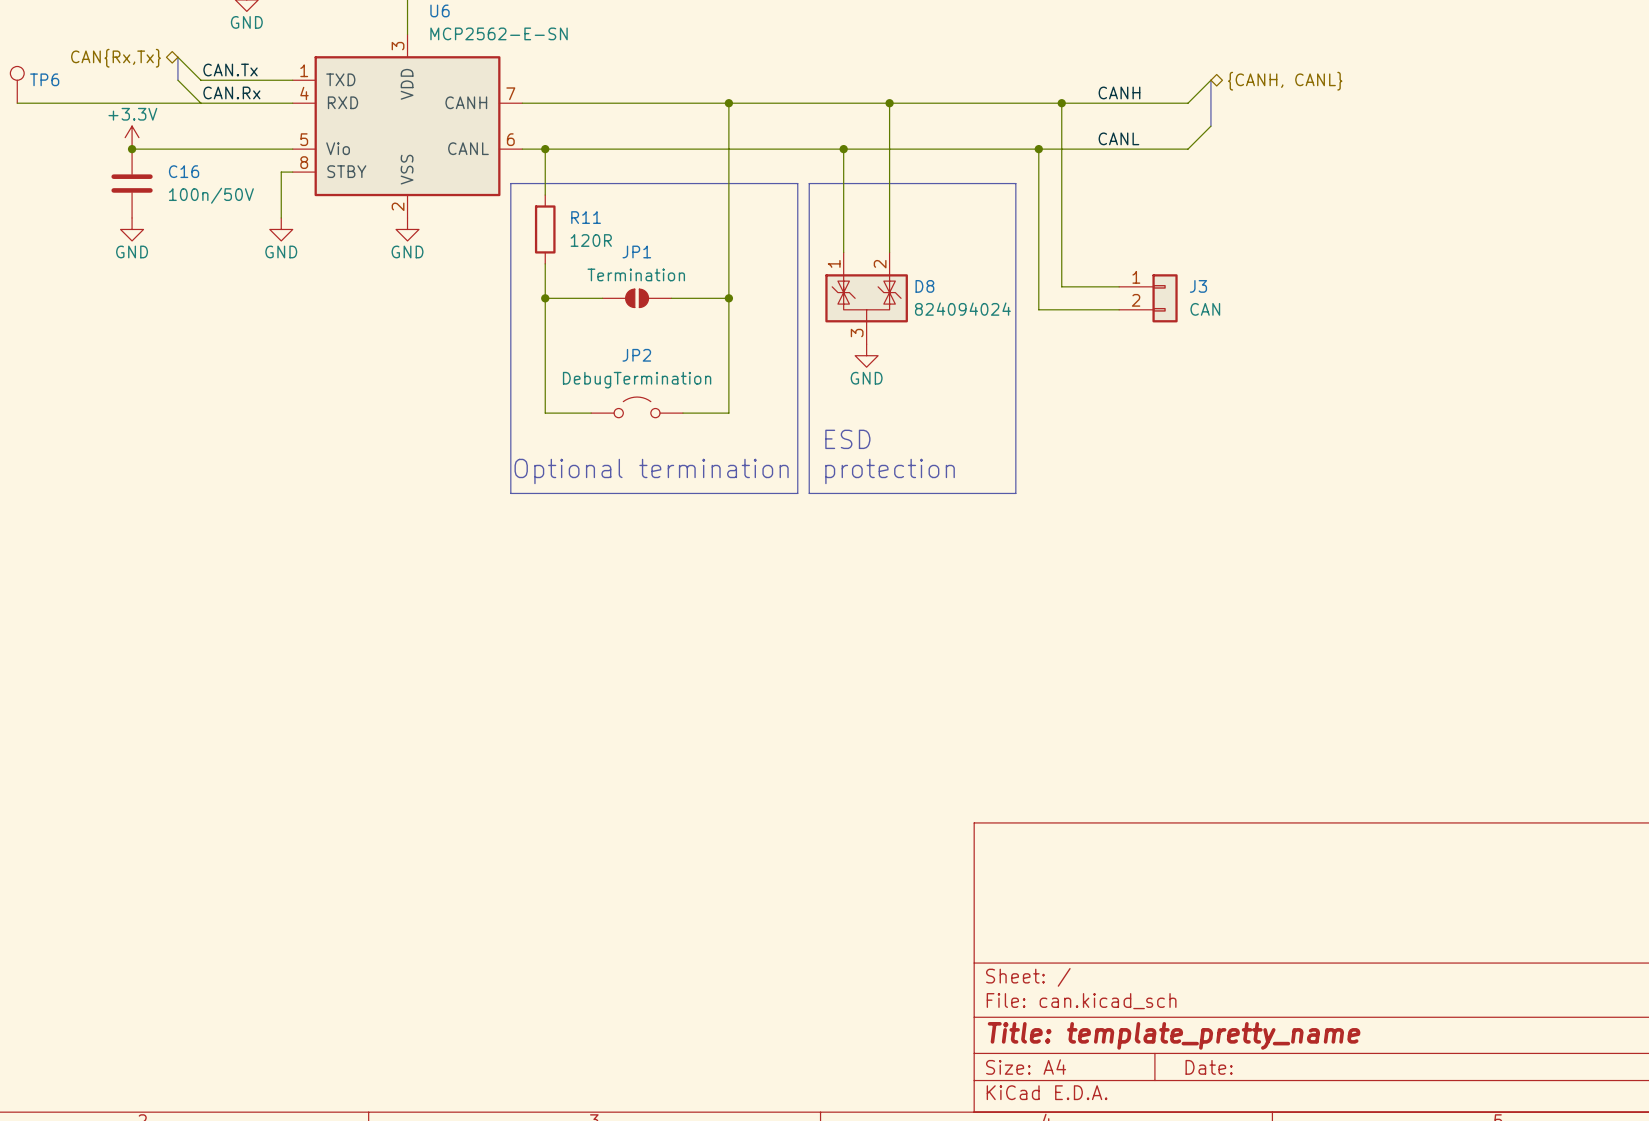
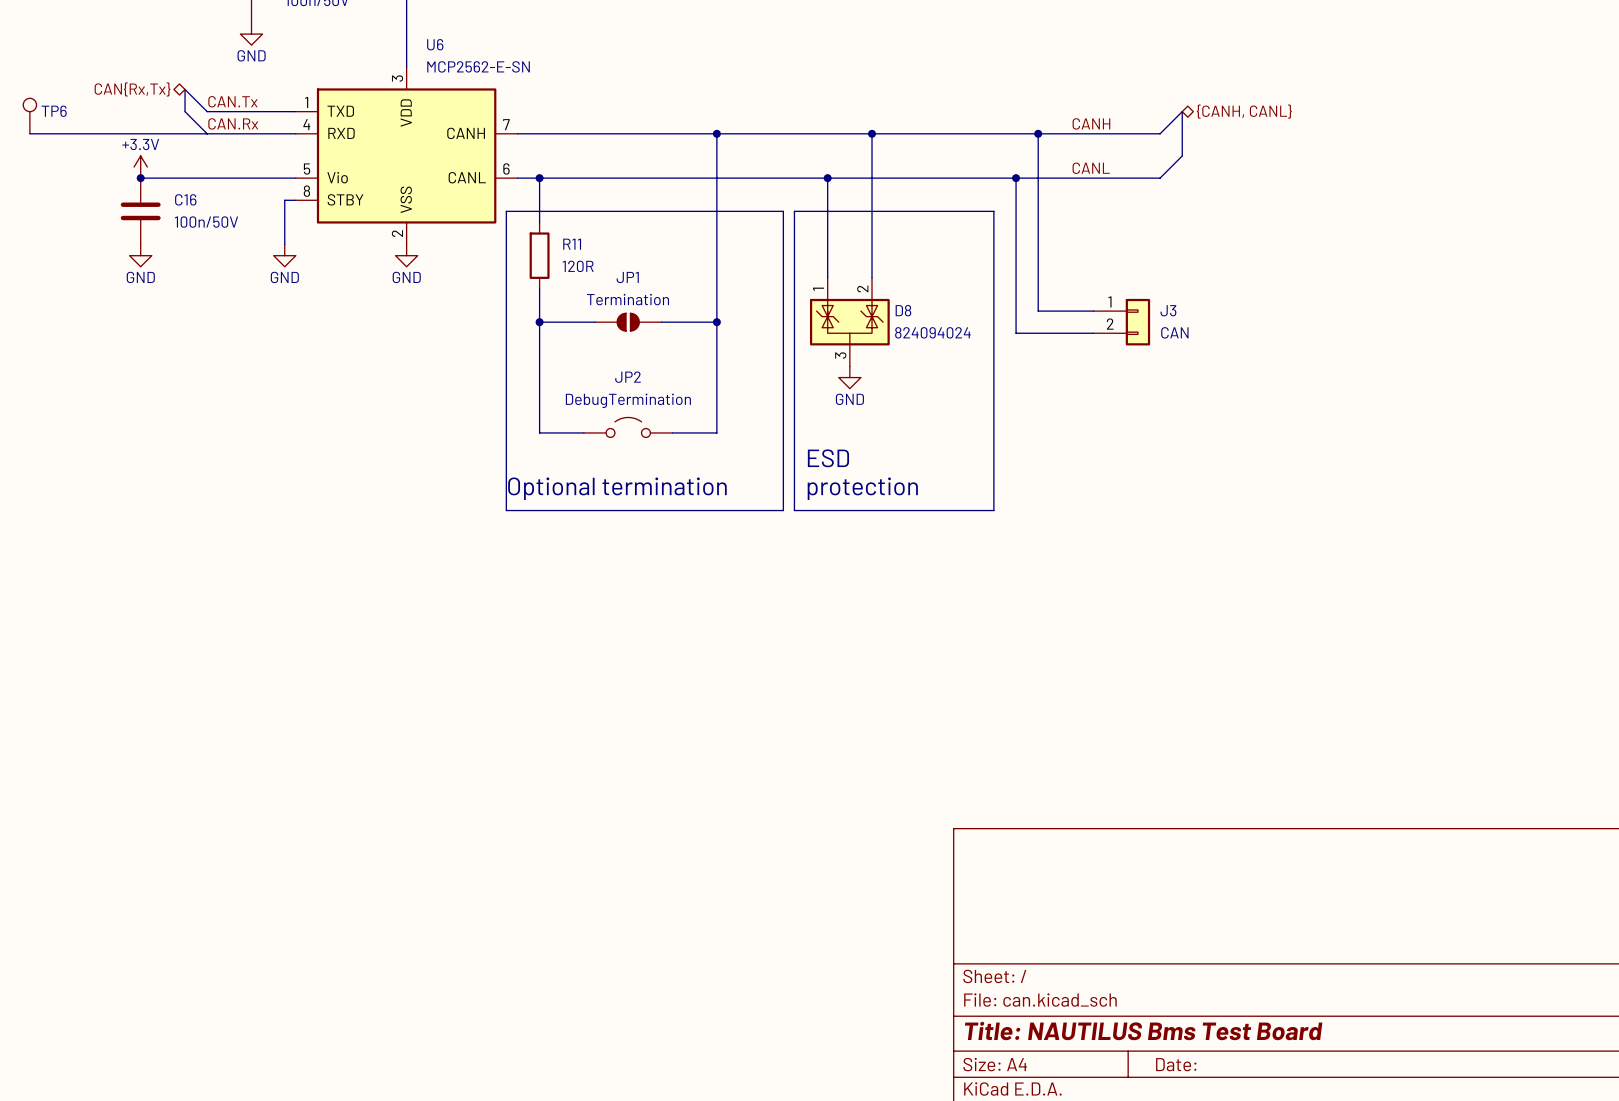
title block: Title: template_pretty_name (1174, 1035) -> Title: NAUTILUS Bms Test Board (1143, 1031)

